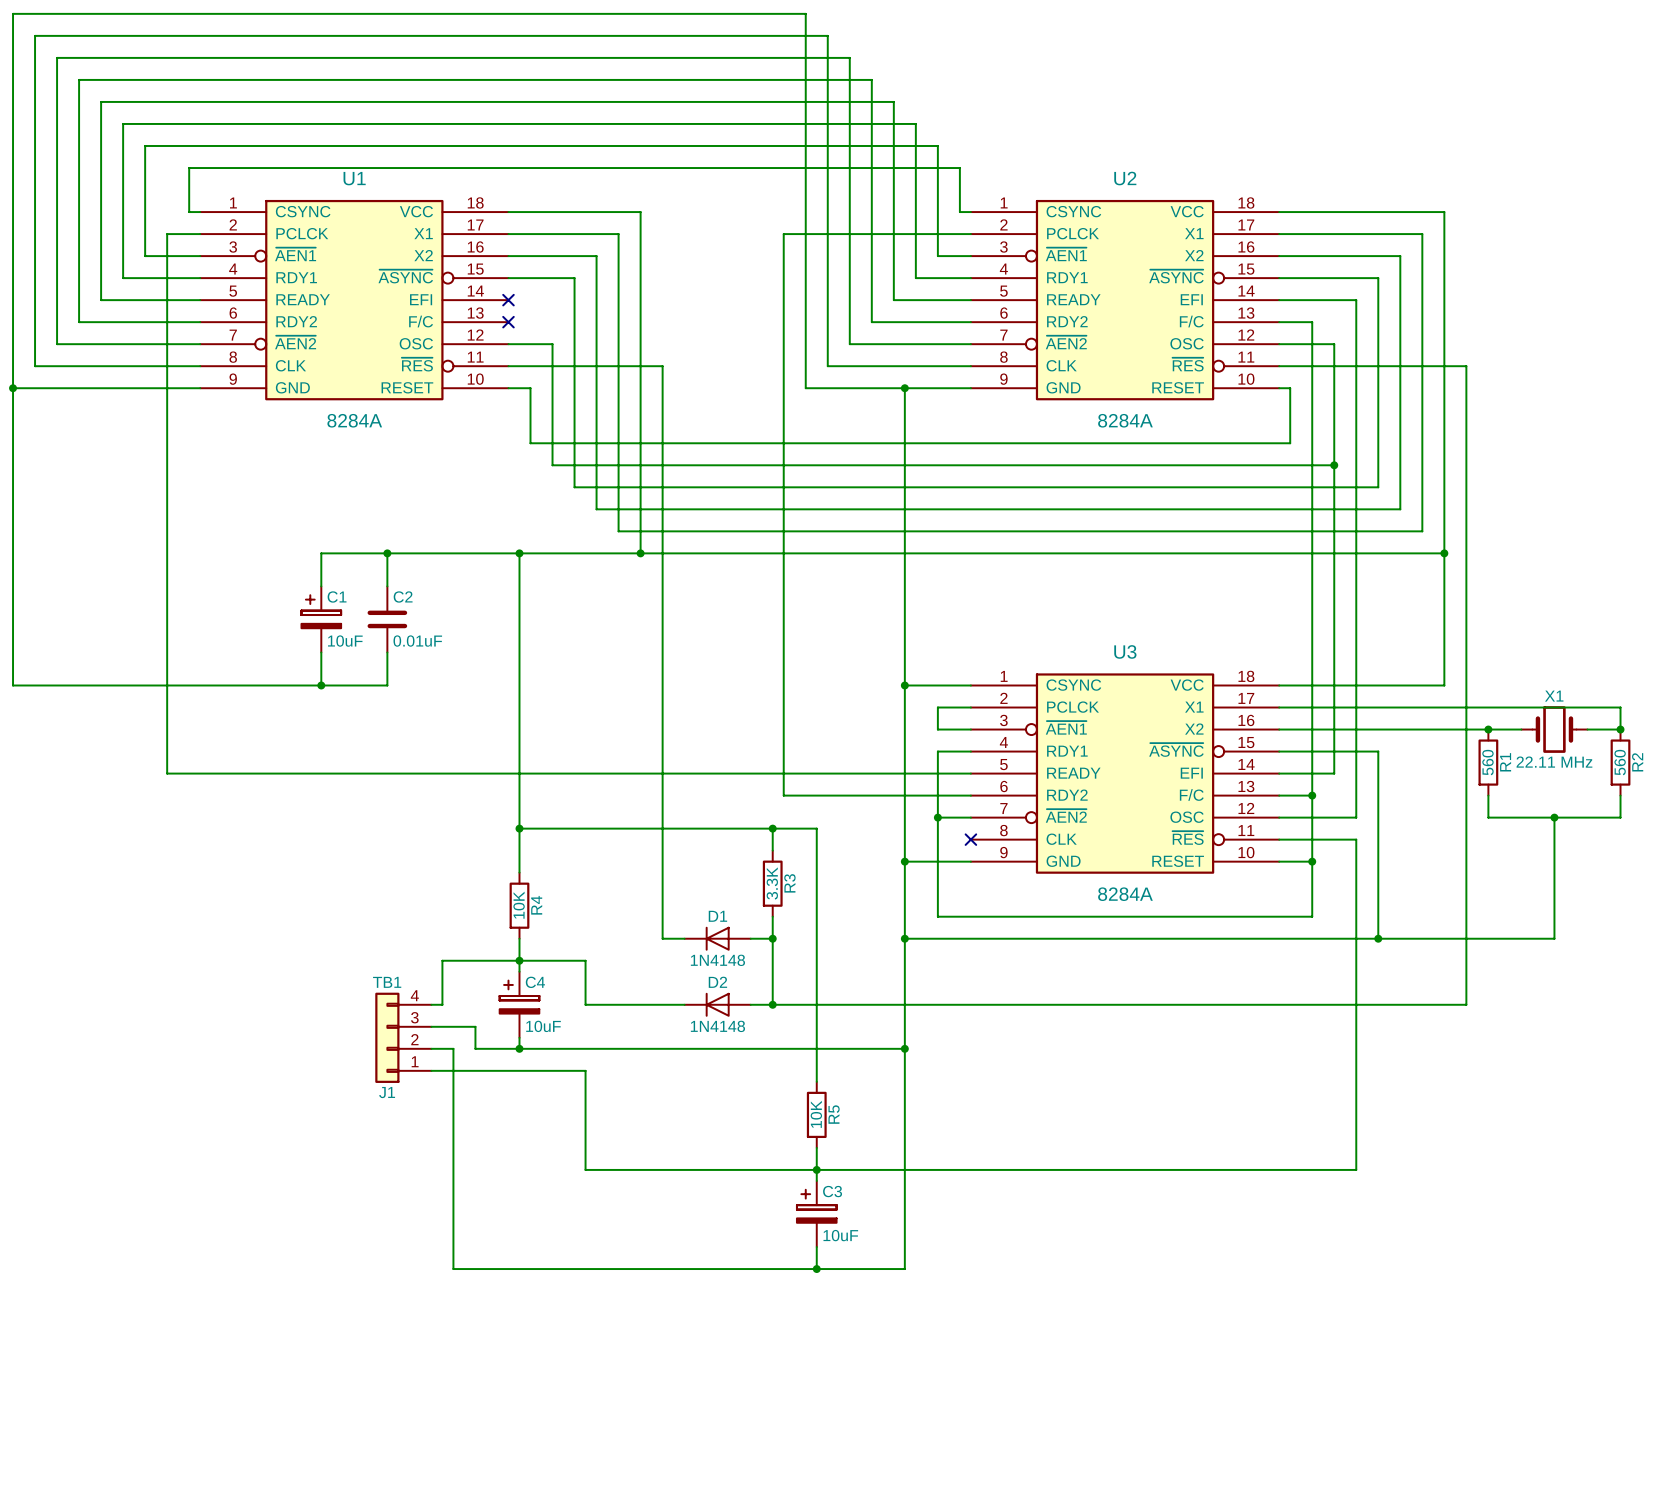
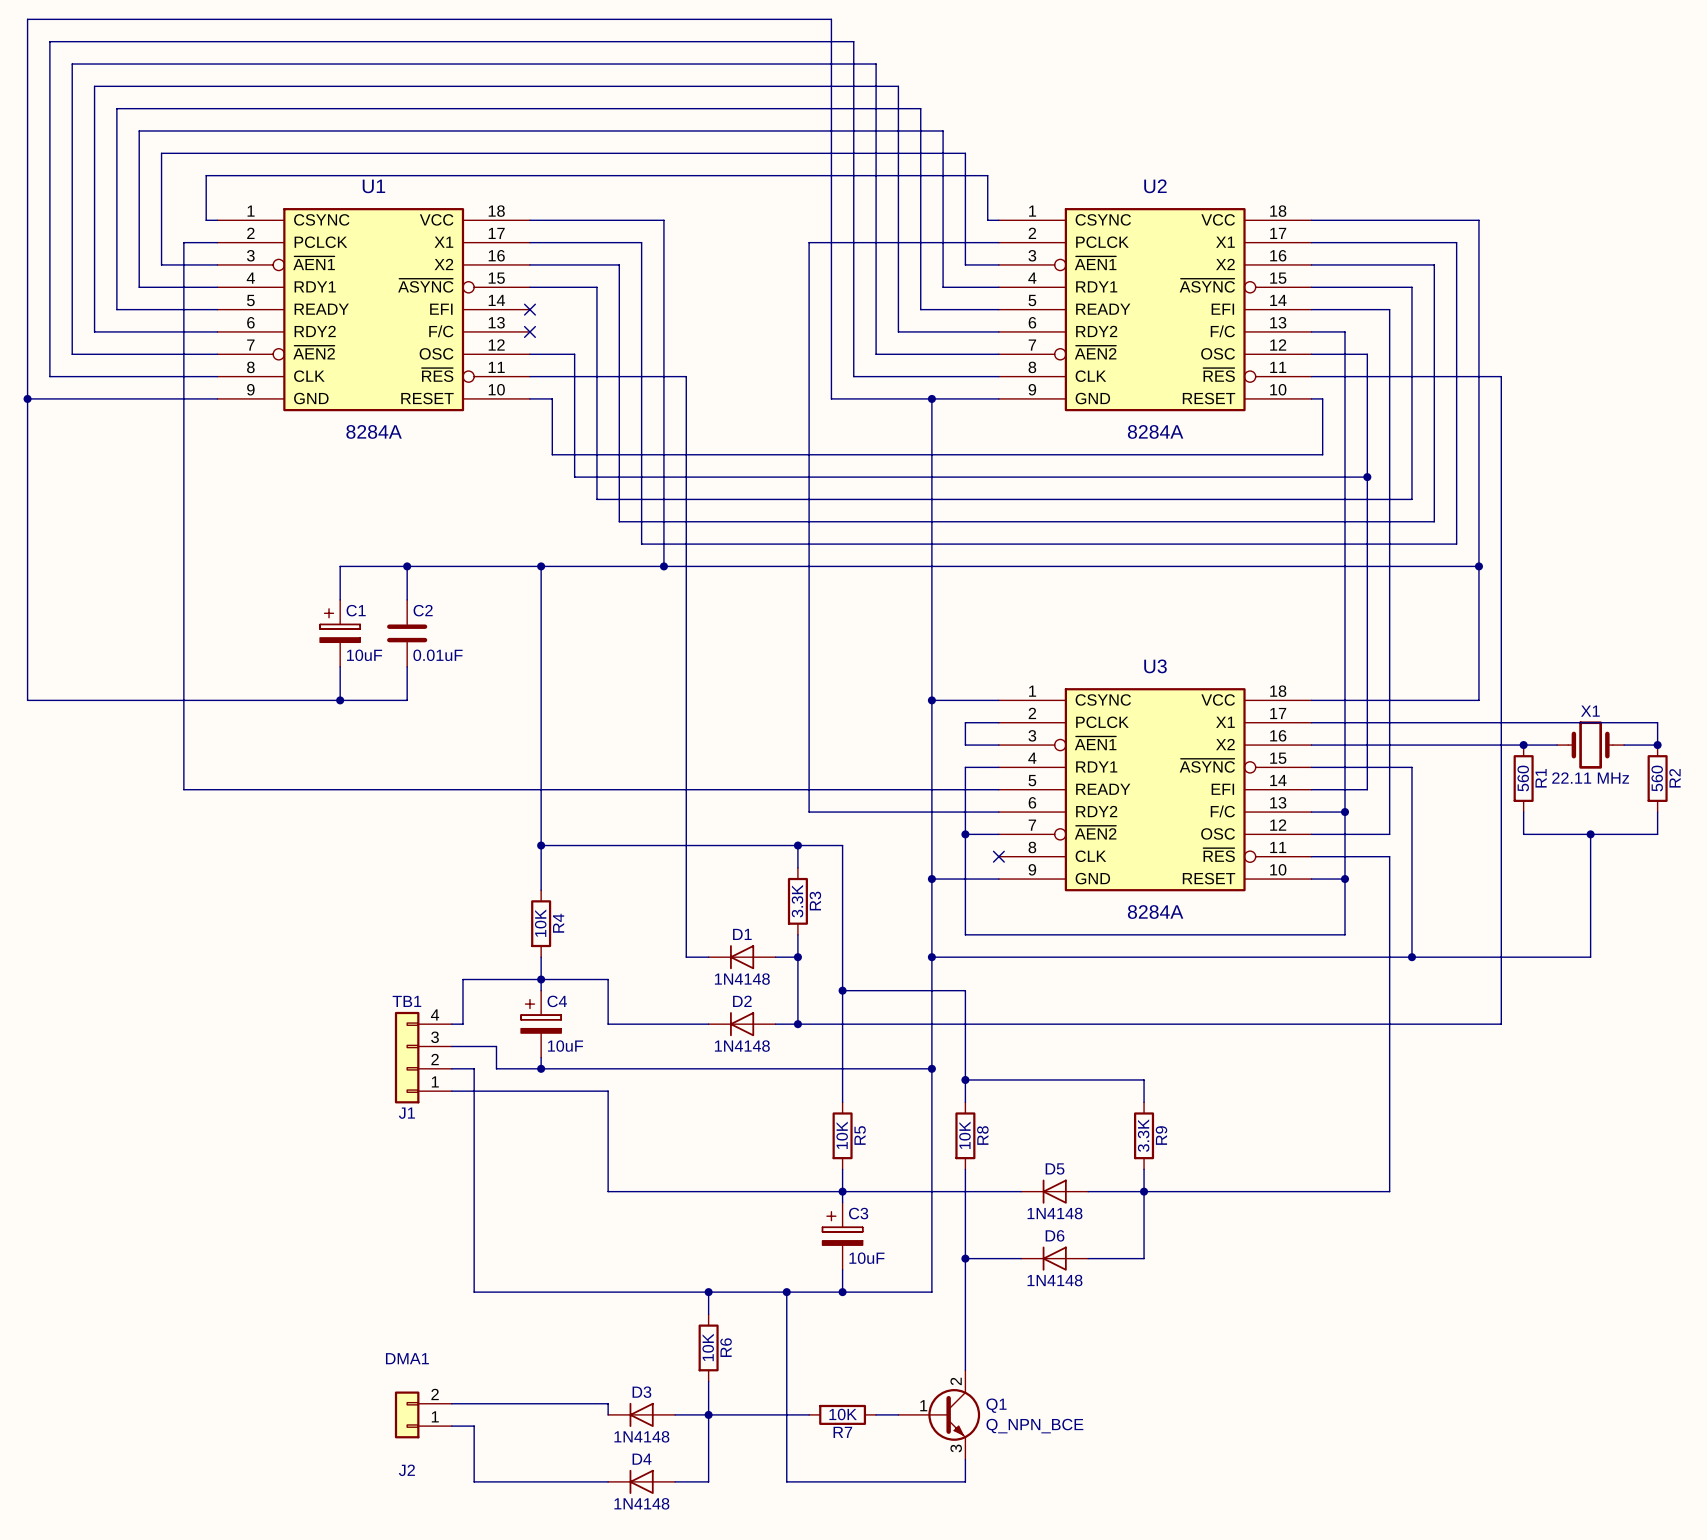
wire: none -> (842, 990) (965, 990) (965, 1102)
junction: none -> (842, 990)
wire: none -> (965, 1079) (1144, 1079) (1144, 1102)
junction: none -> (965, 1079)
R8: none -> 10K (965, 1135)
R9: none -> 3.3K (1144, 1135)
wire: none -> (965, 1169) (965, 1370)
wire: none -> (1144, 1169) (1144, 1258) (1088, 1258)
D5: none -> 1N4148 (1054, 1191)
junction: none -> (1144, 1191)
wire: none -> (965, 1258) (1021, 1258)
junction: none -> (965, 1258)
D6: none -> 1N4148 (1054, 1258)
wire: none -> (708, 1292) (708, 1314)
junction: none -> (708, 1292)
wire: none -> (786, 1292) (786, 1481) (965, 1481) (965, 1459)
junction: none -> (786, 1292)
R6: none -> 10K (708, 1347)
wire: none -> (708, 1381) (708, 1481) (675, 1481)
wire: none -> (451, 1403) (608, 1403) (608, 1414)
J2: none -> DMA1 (423, 1414)
D3: none -> 1N4148 (641, 1414)
wire: none -> (675, 1414) (809, 1414)
junction: none -> (708, 1414)
R7: none -> 10K (842, 1414)
wire: none -> (876, 1414) (898, 1414)
Q1: none -> Q_NPN_BCE (939, 1414)
wire: none -> (451, 1426) (474, 1426) (474, 1481) (608, 1481)
D4: none -> 1N4148 (641, 1481)

